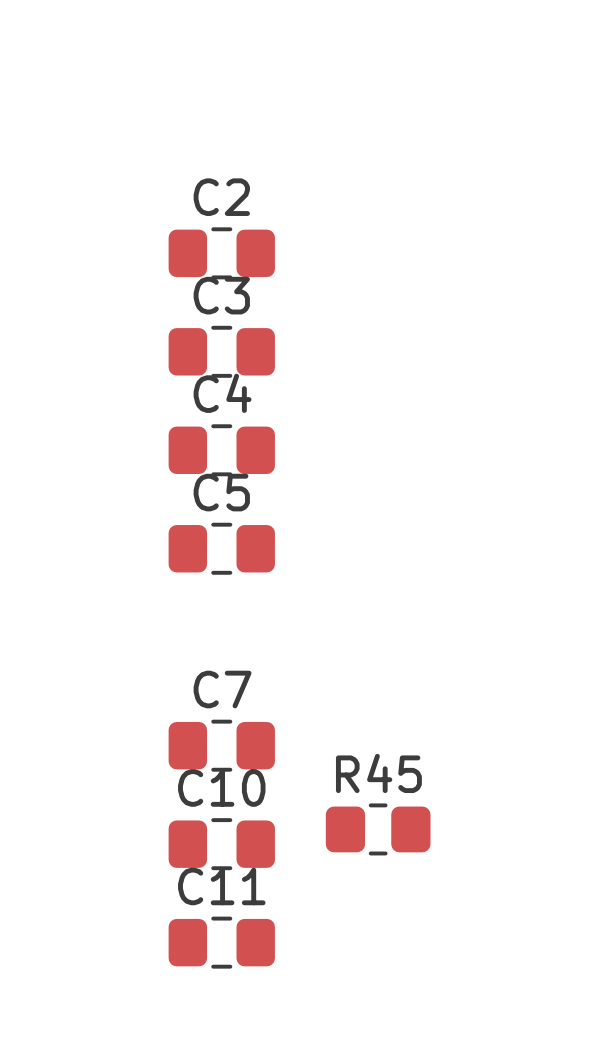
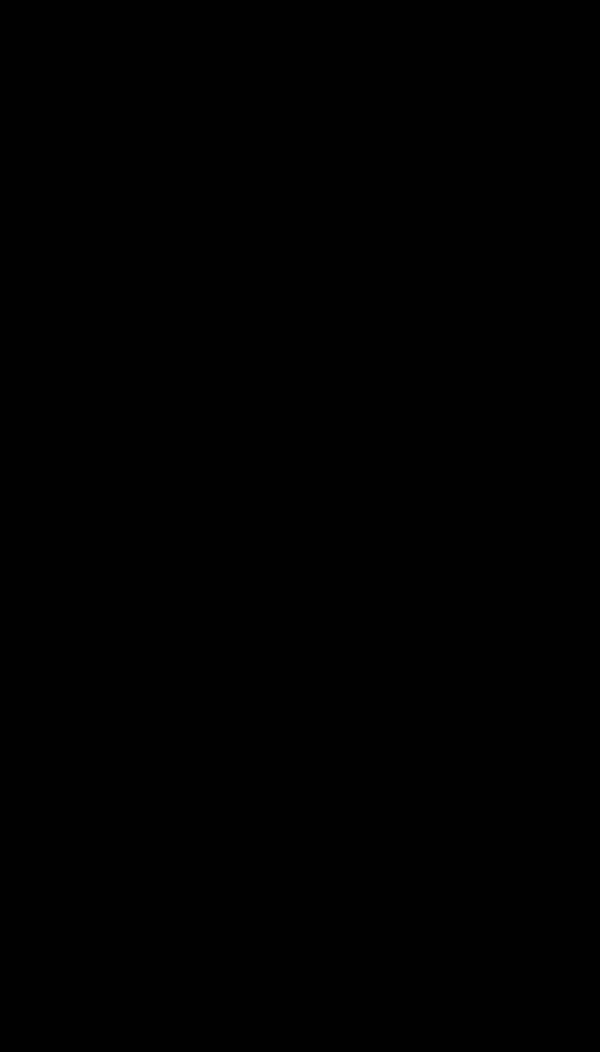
C2: (221, 253) -> none
C3: (221, 351) -> none
C4: (221, 450) -> none
C5: (221, 548) -> none
C7: (221, 745) -> none
R45: (378, 829) -> none
C10: (221, 844) -> none
C11: (221, 942) -> none

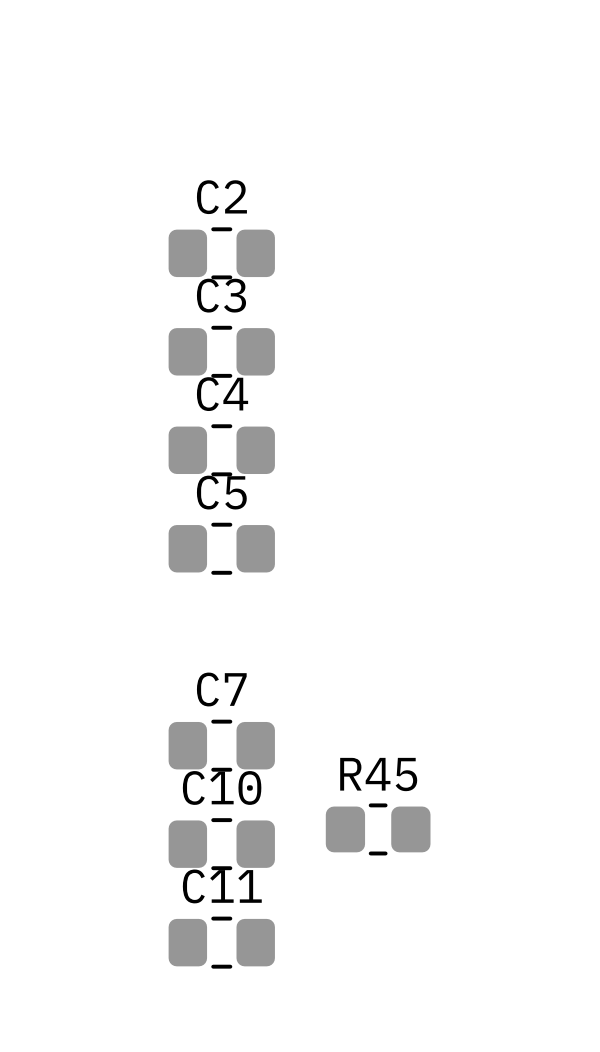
C2: none -> (221, 253)
C3: none -> (221, 351)
C4: none -> (221, 450)
C5: none -> (221, 548)
C7: none -> (221, 745)
R45: none -> (378, 829)
C10: none -> (221, 844)
C11: none -> (221, 942)

